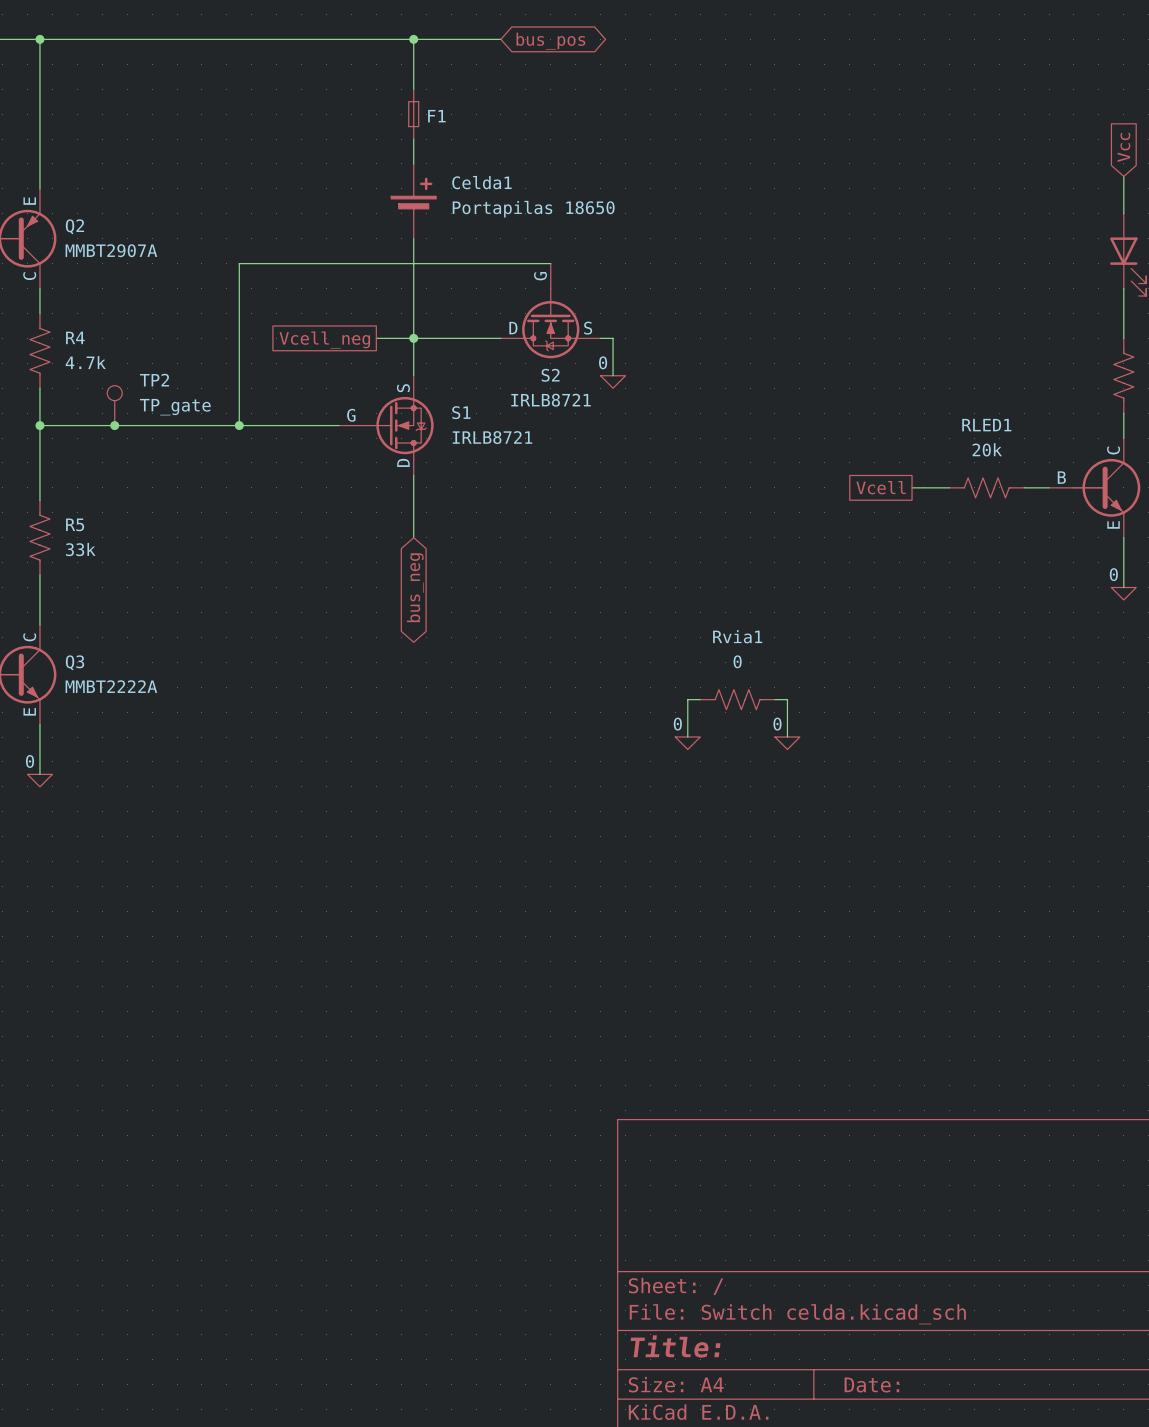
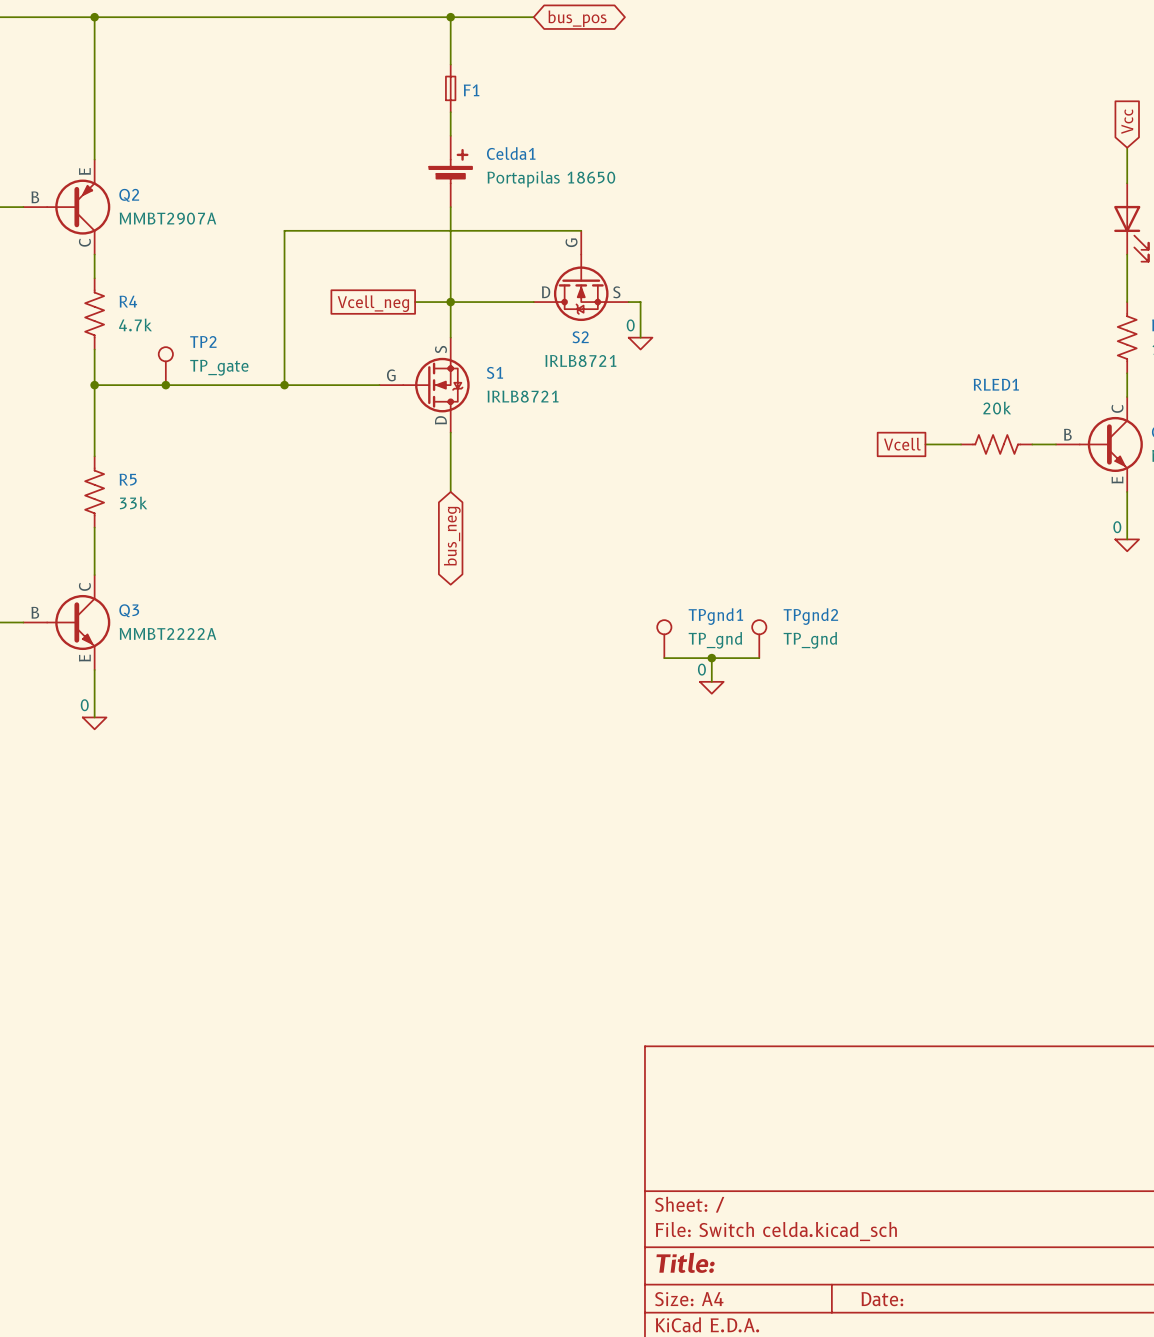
TPgnd1: none -> TP_gnd (664, 639)
TPgnd2: none -> TP_gnd (759, 639)
wire: (700, 699) (687, 699) (687, 712) -> none
Rvia1: 0 (737, 699) -> none
wire: (774, 699) (787, 699) (787, 737) -> none
wire: none -> (664, 658) (759, 658)
junction: none -> (711, 658)
power symbol: 0 (787, 743) -> none

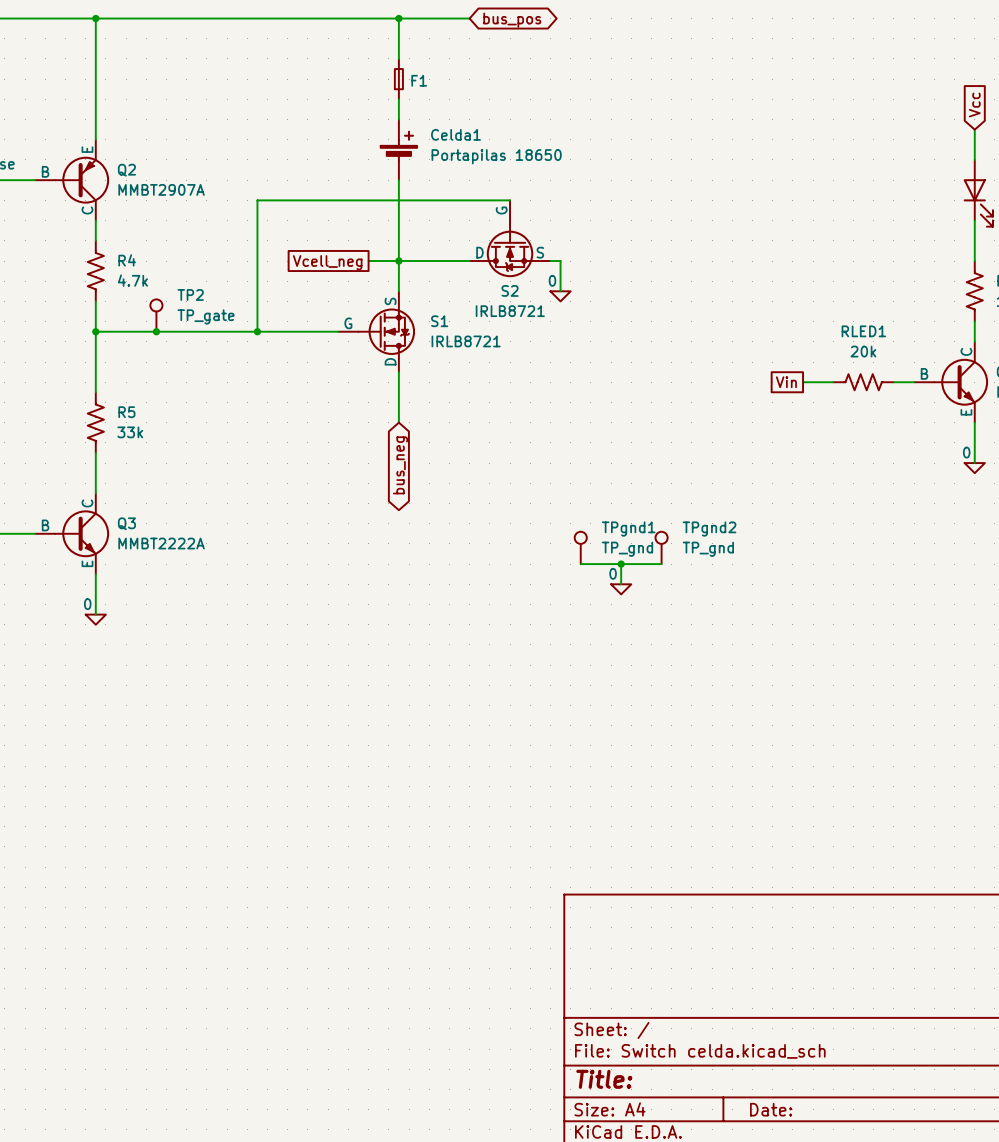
global label: Vcell (902, 444) -> Vin (786, 382)

